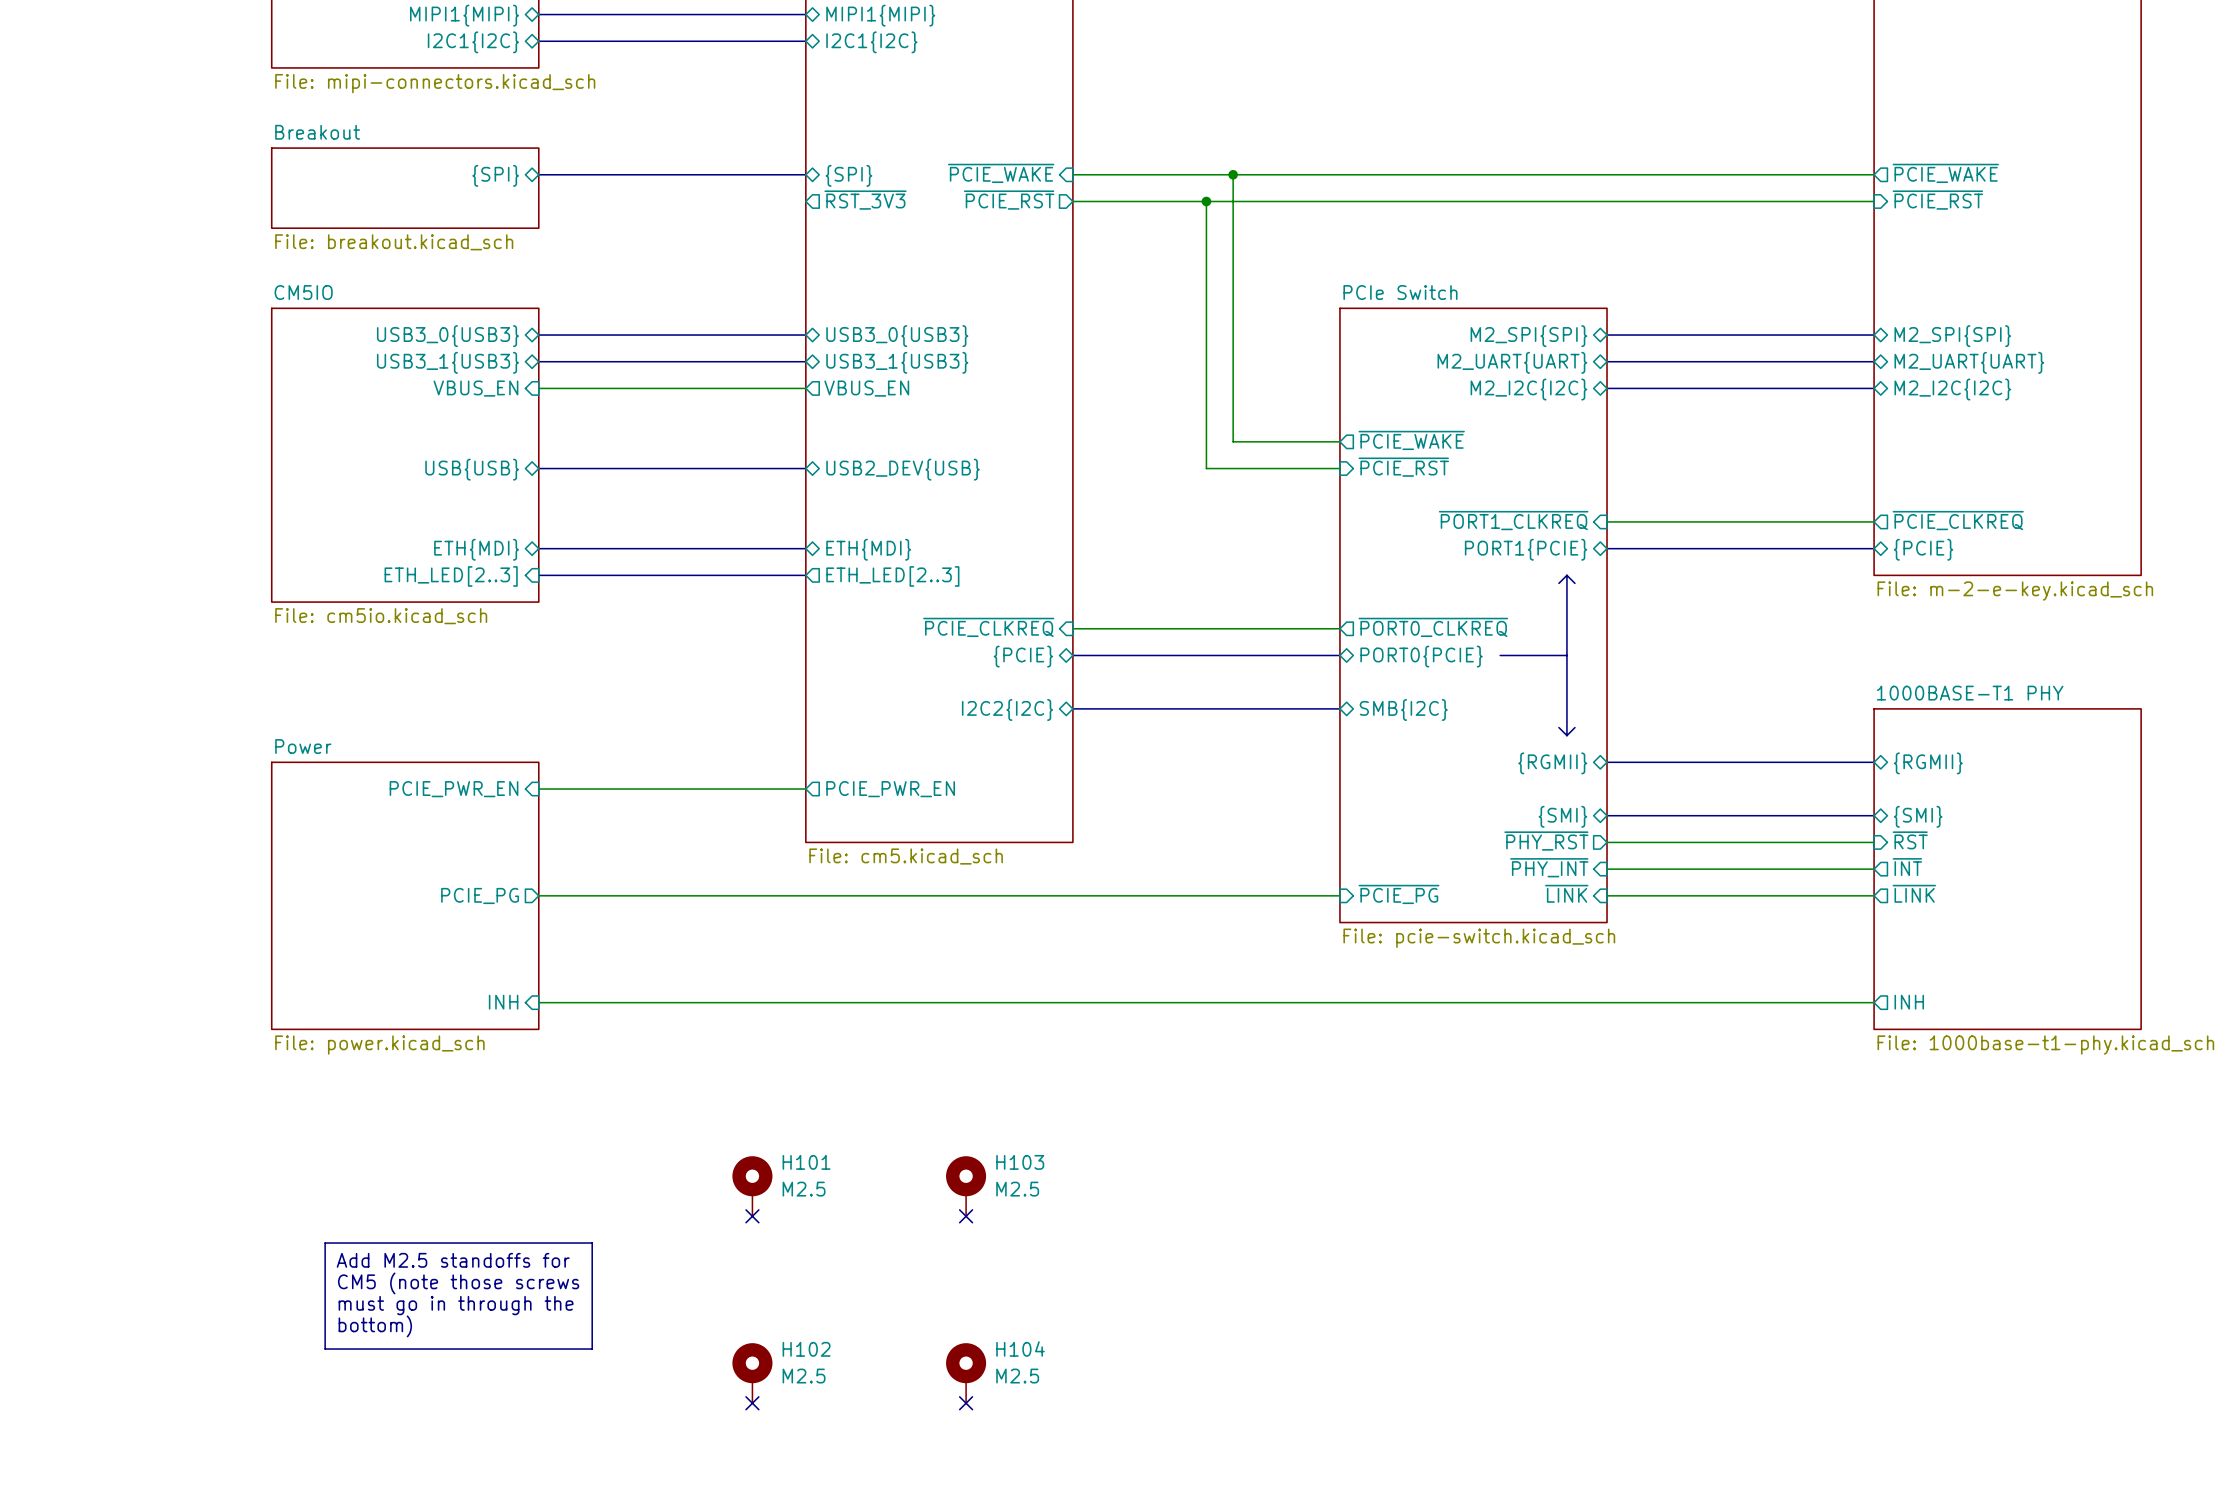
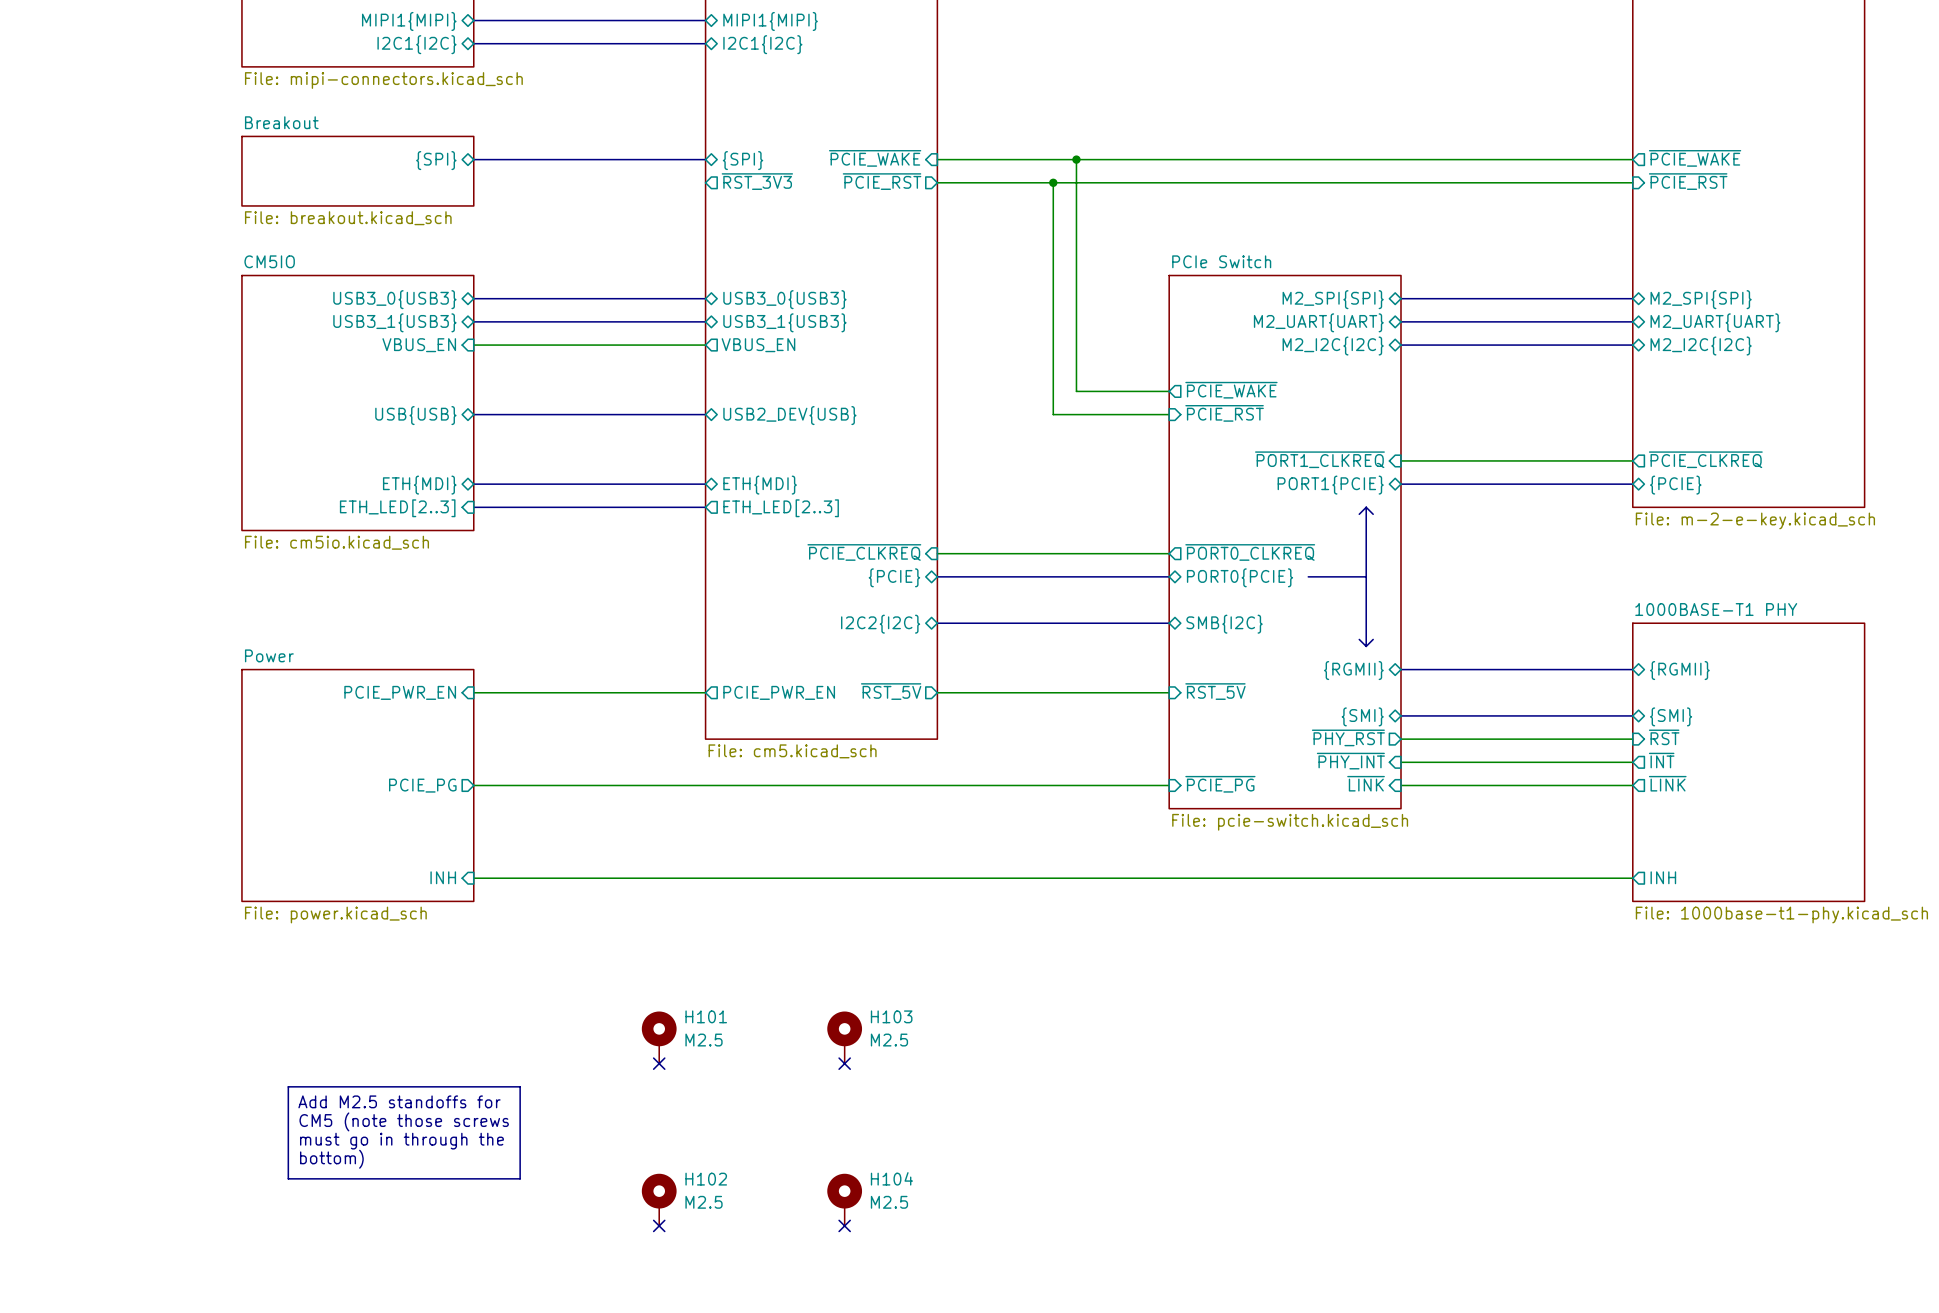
sheet pin: none -> ~{RST_5V} (891, 691)
sheet pin: none -> ~{RST_5V} (1215, 691)
wire: none -> (937, 692) (1169, 692)

